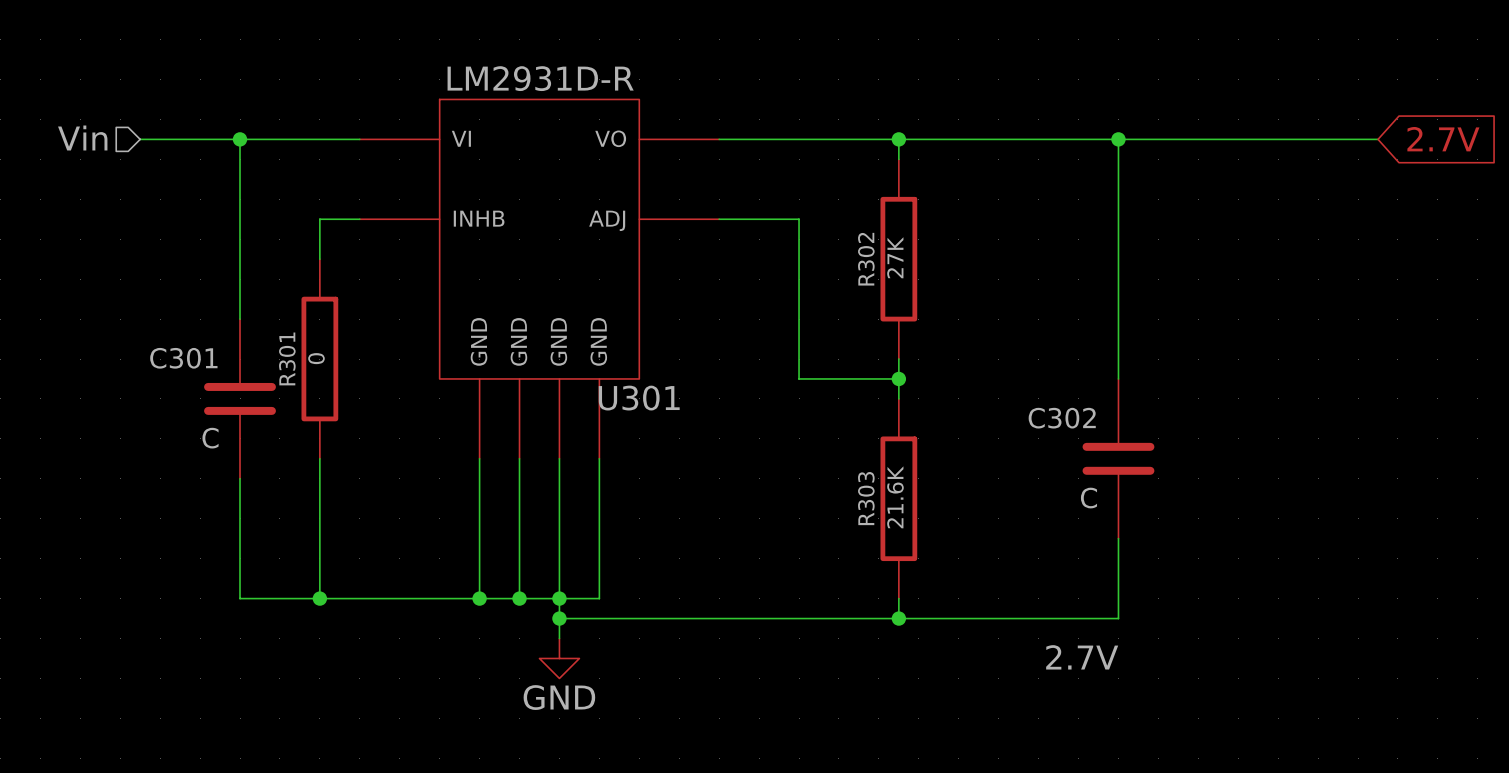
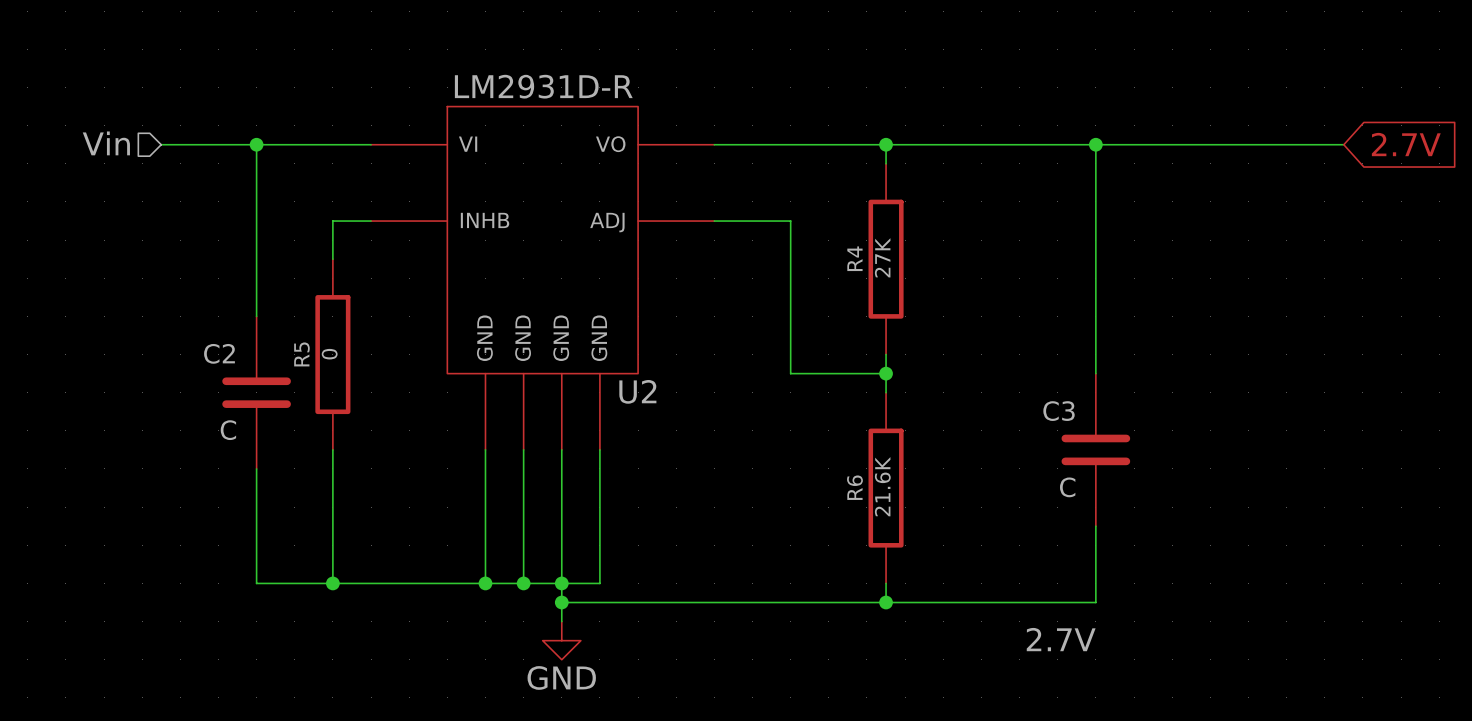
R302 name: R302 (866, 259) -> R4 (854, 258)
C301 name: C301 (183, 358) -> C2 (219, 353)
R301 name: R301 (287, 358) -> R5 (301, 354)
U301 name: U301 (639, 398) -> U2 (637, 391)
C302 name: C302 (1062, 418) -> C3 (1059, 411)
R303 name: R303 (866, 498) -> R6 (854, 487)

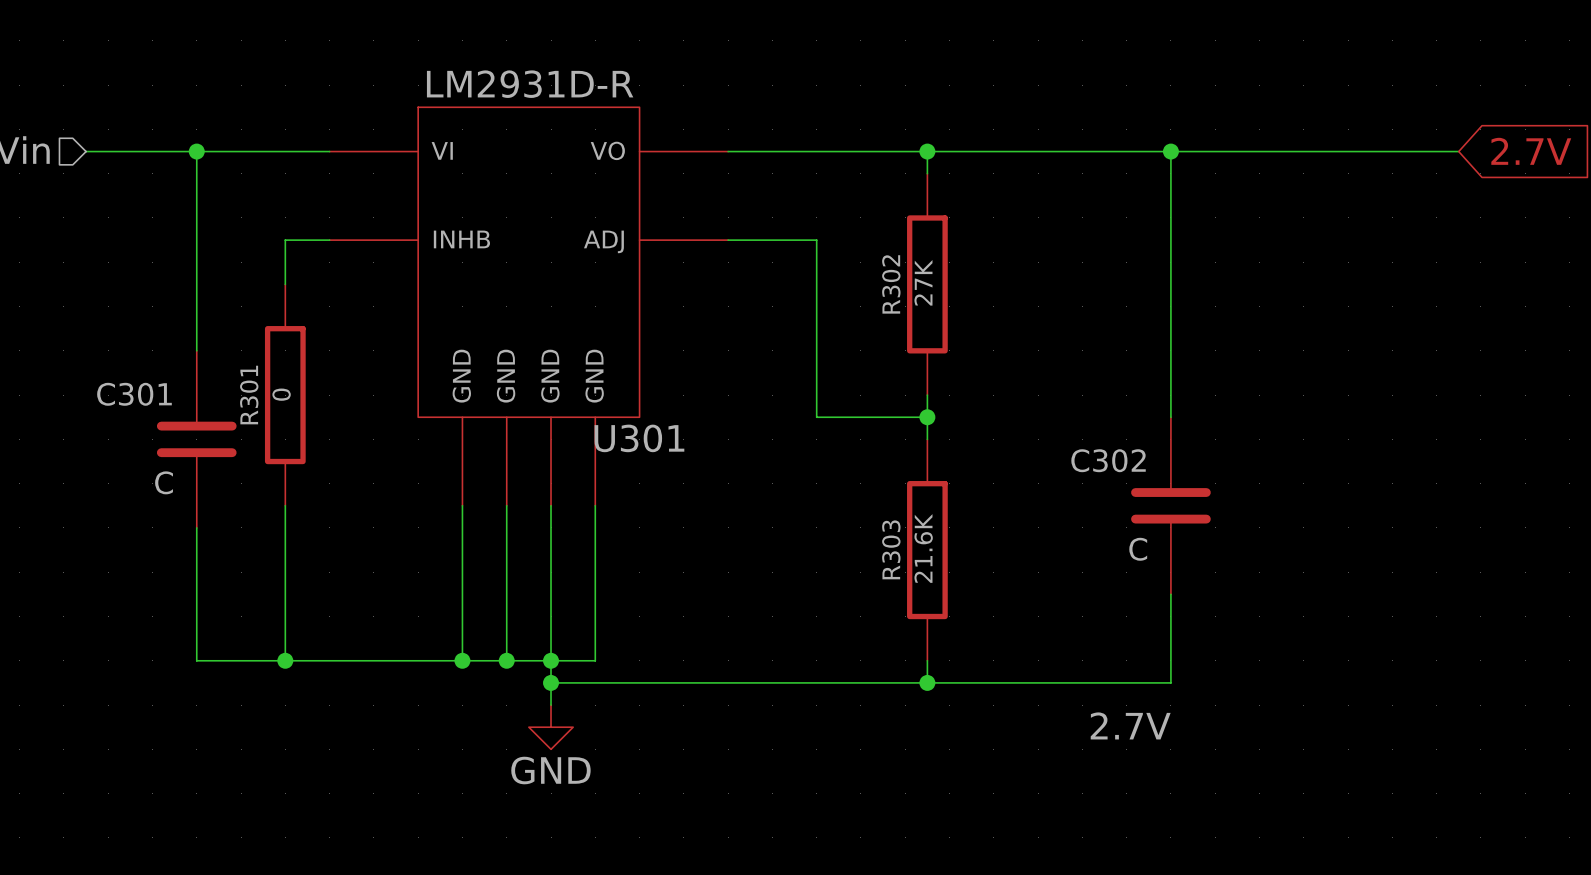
R4 name: R4 (854, 258) -> R302 (891, 284)
C2 name: C2 (219, 353) -> C301 (134, 394)
R5 name: R5 (301, 354) -> R301 (249, 395)
U2 name: U2 (637, 391) -> U301 (639, 438)
C3 name: C3 (1059, 411) -> C302 (1108, 460)
R6 name: R6 (854, 487) -> R303 (891, 549)

